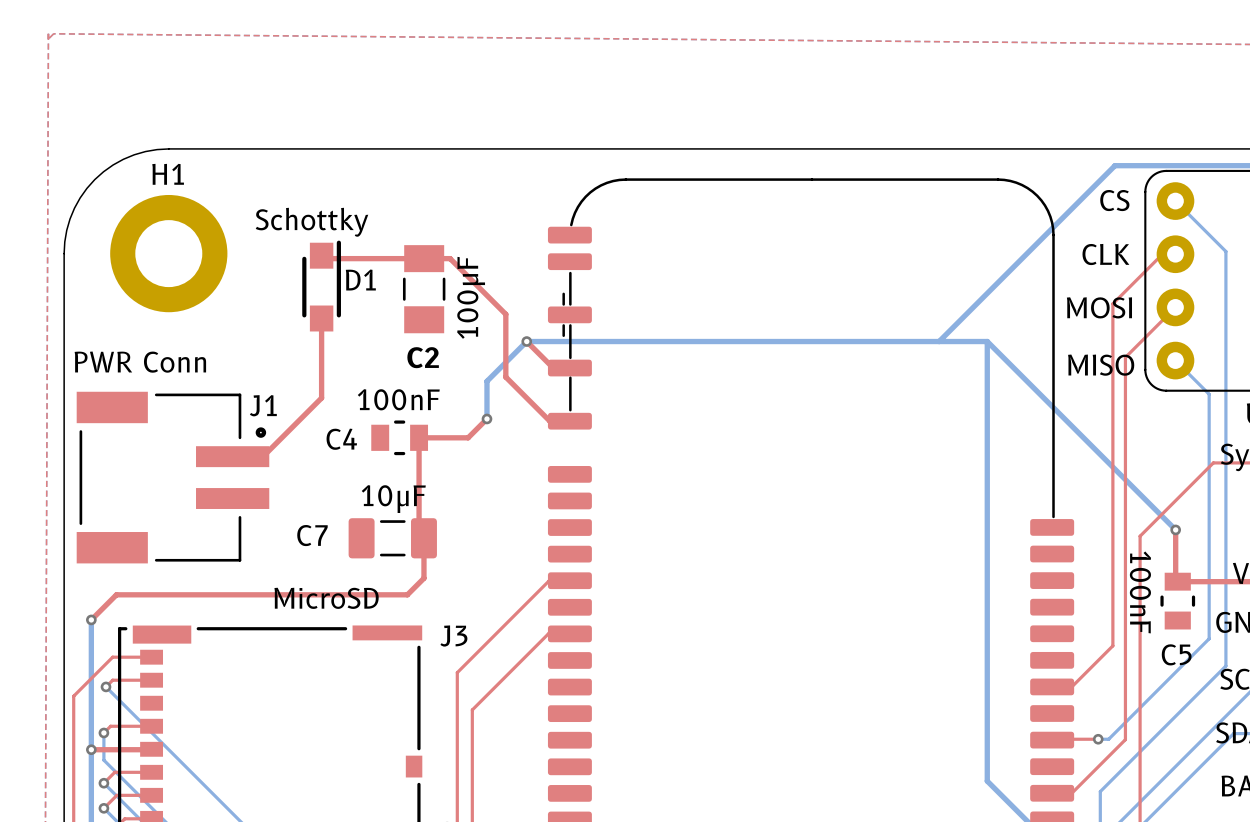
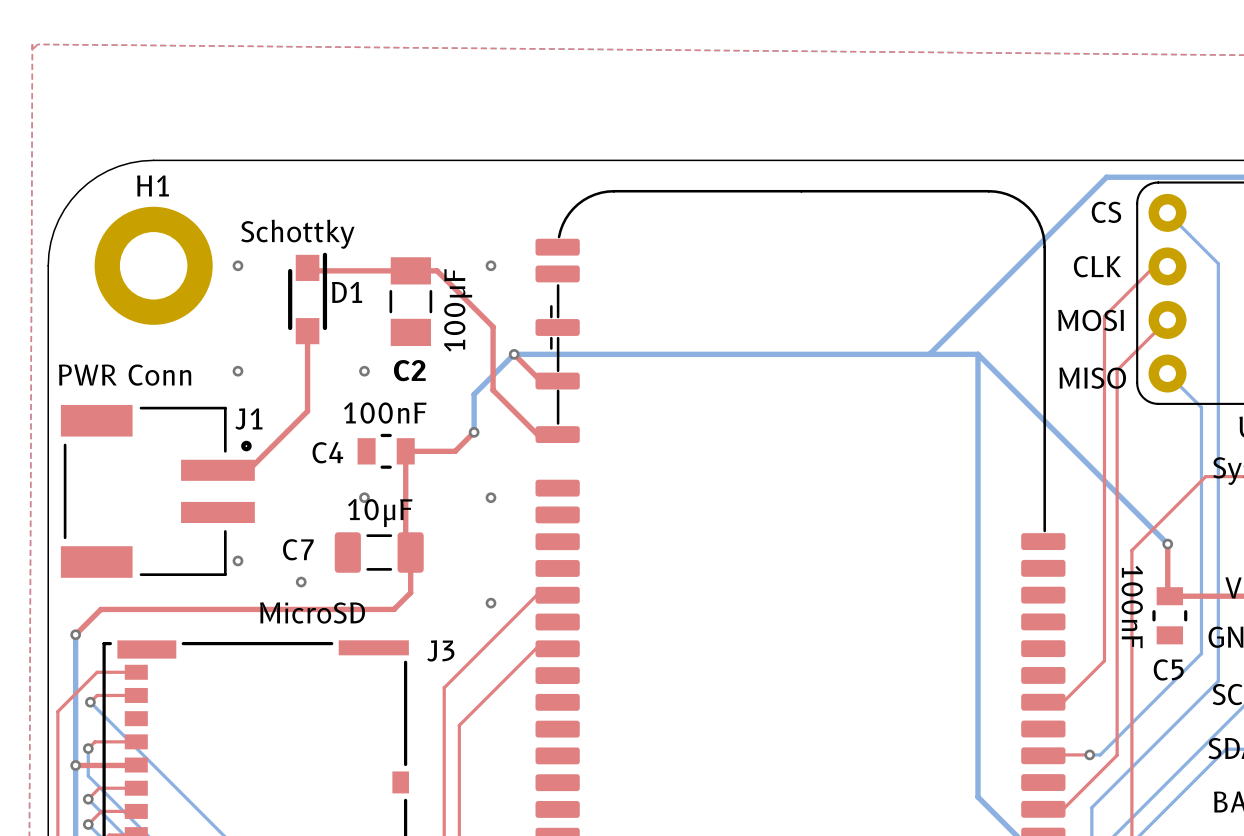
via: none -> (237, 265)
via: none -> (490, 265)
via: none -> (237, 371)
via: none -> (364, 371)
via: none -> (364, 497)
via: none -> (490, 497)
via: none -> (237, 560)
via: none -> (301, 582)
via: none -> (490, 603)

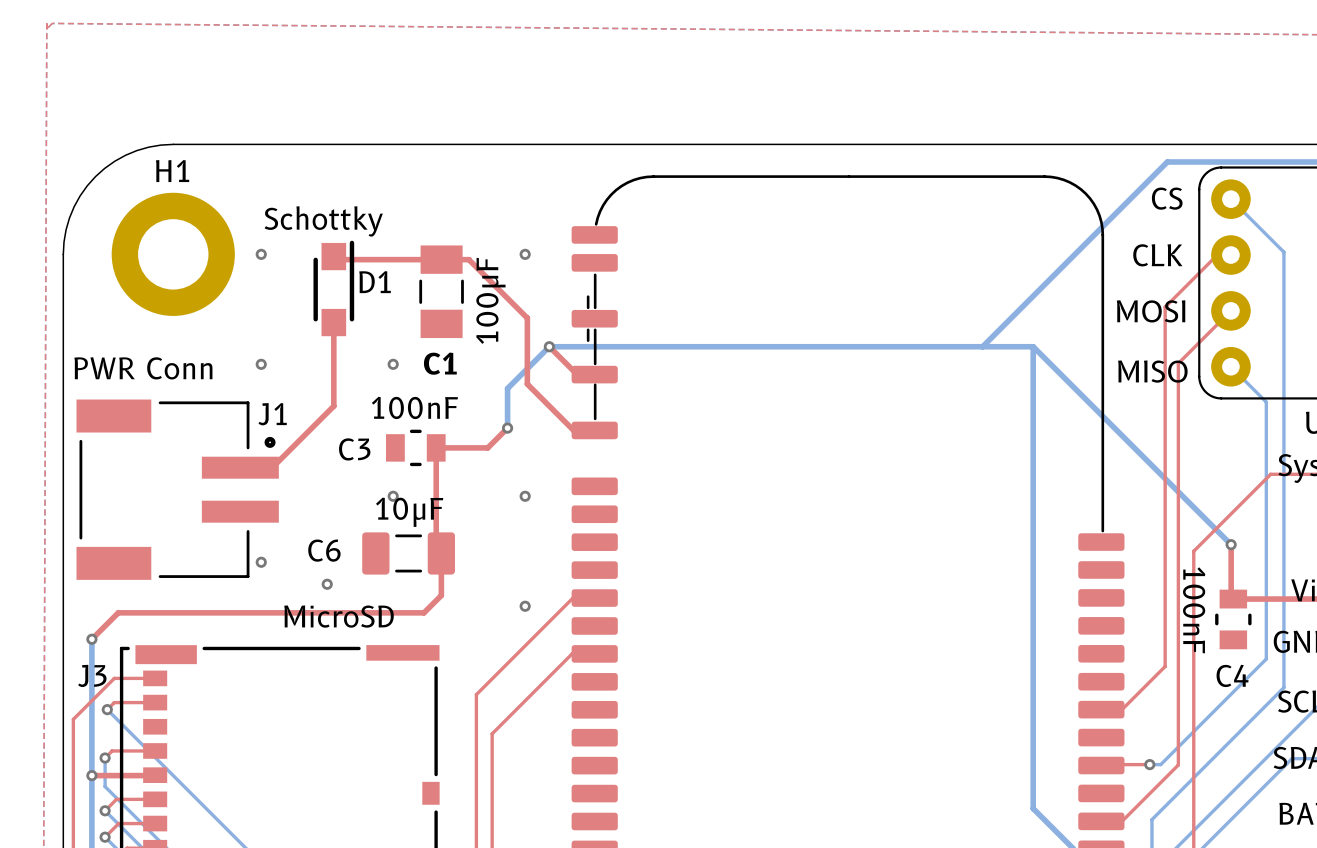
C2 name: C2 (409, 370) -> C1 (440, 363)
C4 name: C4 (327, 452) -> C3 (354, 449)
C7 name: C7 (298, 549) -> C6 (324, 550)
J3 name position: J3 (440, 650) -> J3 (92, 675)
C5 name: C5 (1168, 669) -> C4 (1232, 675)

